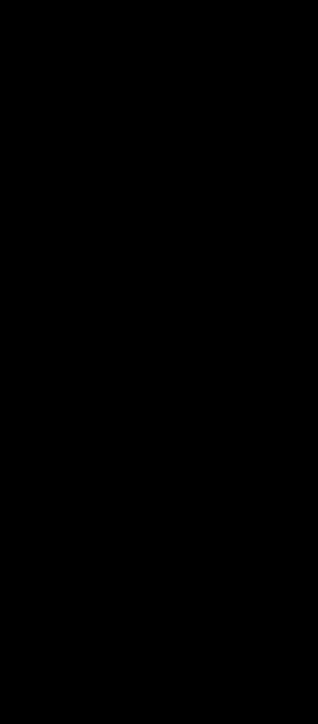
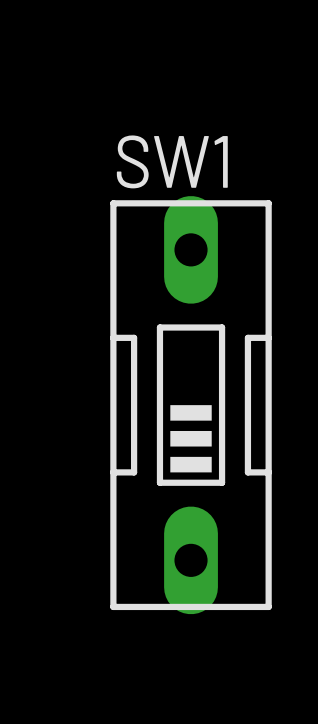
SW1: none -> (191, 405)

